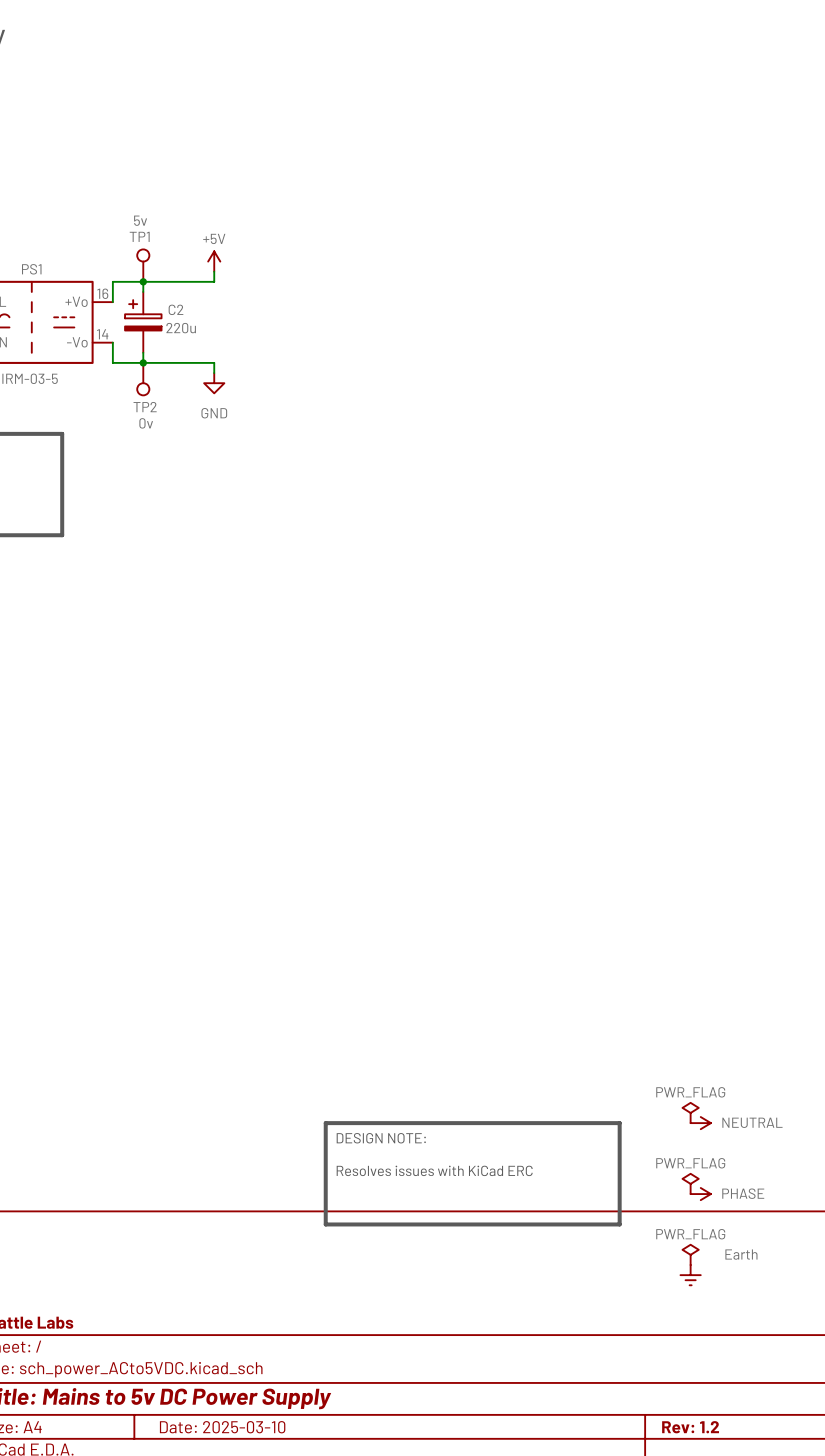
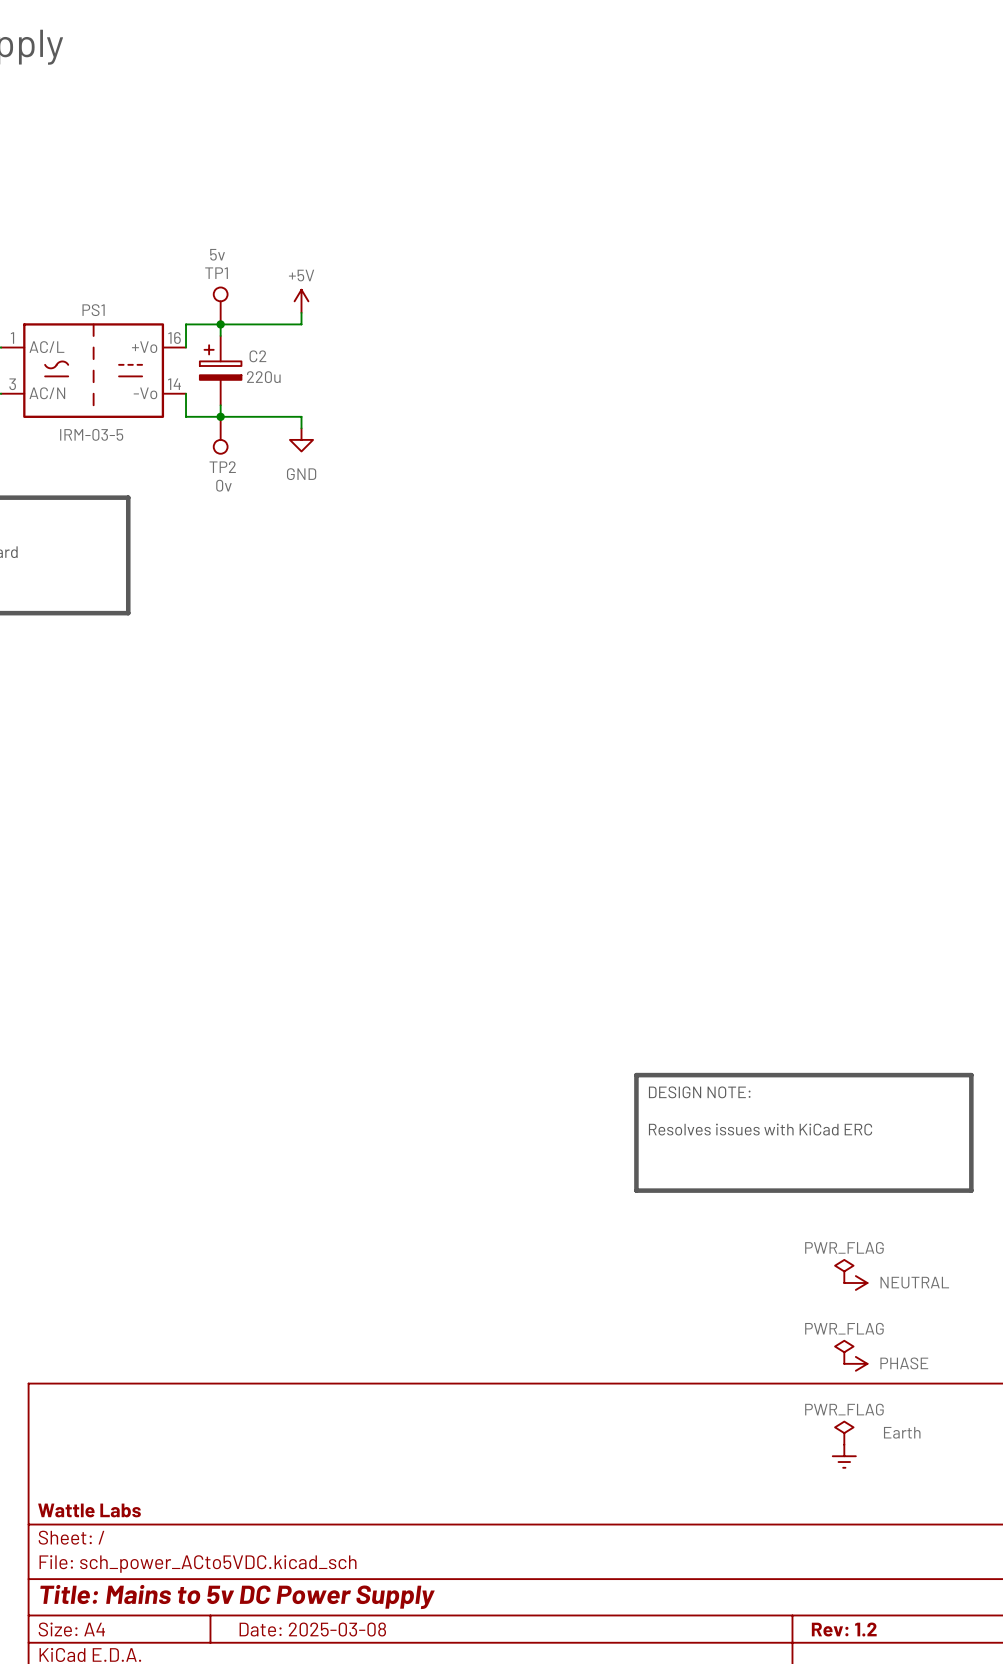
line: none -> (636, 1075) (971, 1075) (971, 1190) (636, 1190) (636, 1075)
text: none -> DESIGN NOTE: (699, 1092)
text: none -> Resolves issues with KiCad ERC (760, 1129)
line: (325, 1123) (619, 1123) (619, 1224) (325, 1224) (325, 1123) -> none
text: DESIGN NOTE: (381, 1138) -> none
text: Resolves issues with KiCad ERC (434, 1170) -> none
title block: Date: 2025-03-10 (222, 1427) -> Date: 2025-03-08 (312, 1629)

